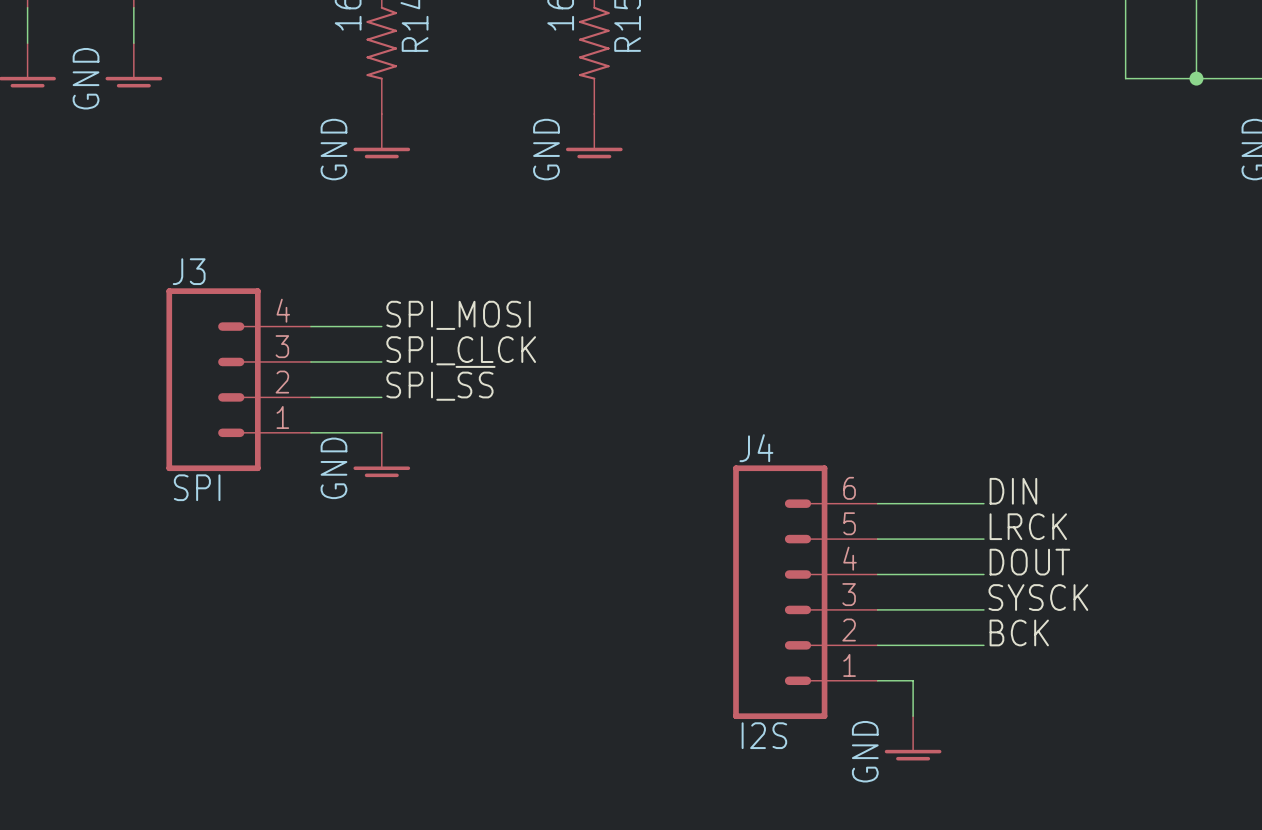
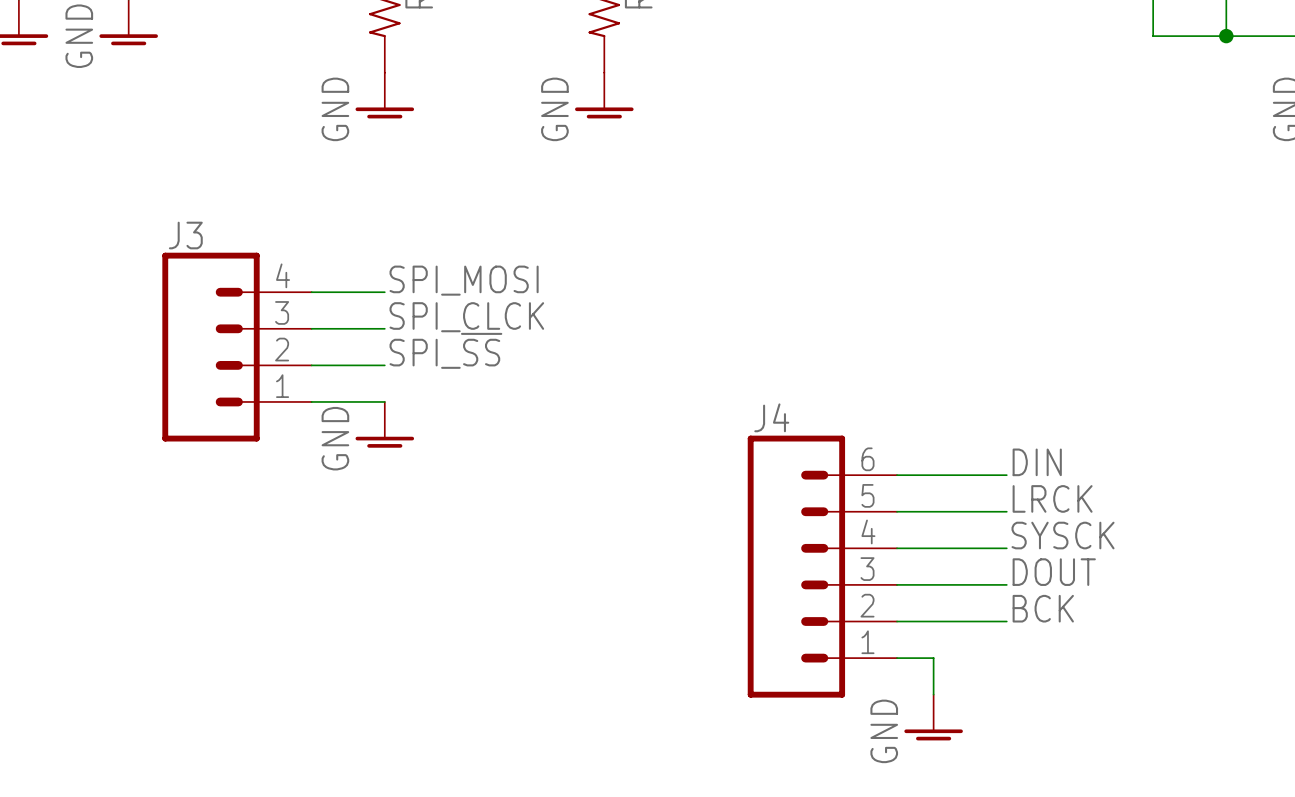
J3 value: SPI (197, 487) -> none
label: DOUT (1029, 562) -> SYSCK (1063, 535)
label: SYSCK (1038, 597) -> DOUT (1054, 572)
J4 value: I2S (764, 735) -> none

